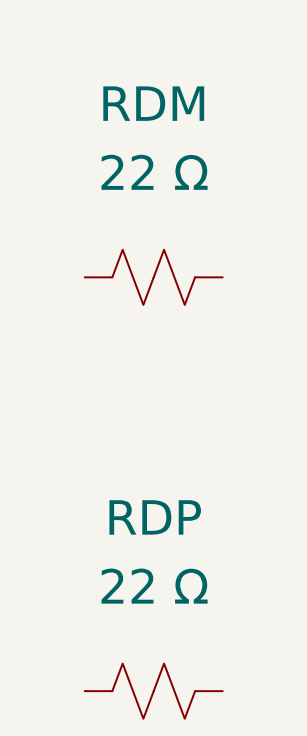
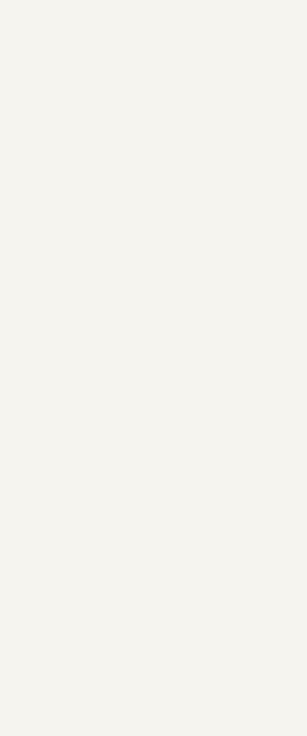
RDM: 22 Ω (153, 277) -> none
RDP: 22 Ω (153, 691) -> none

